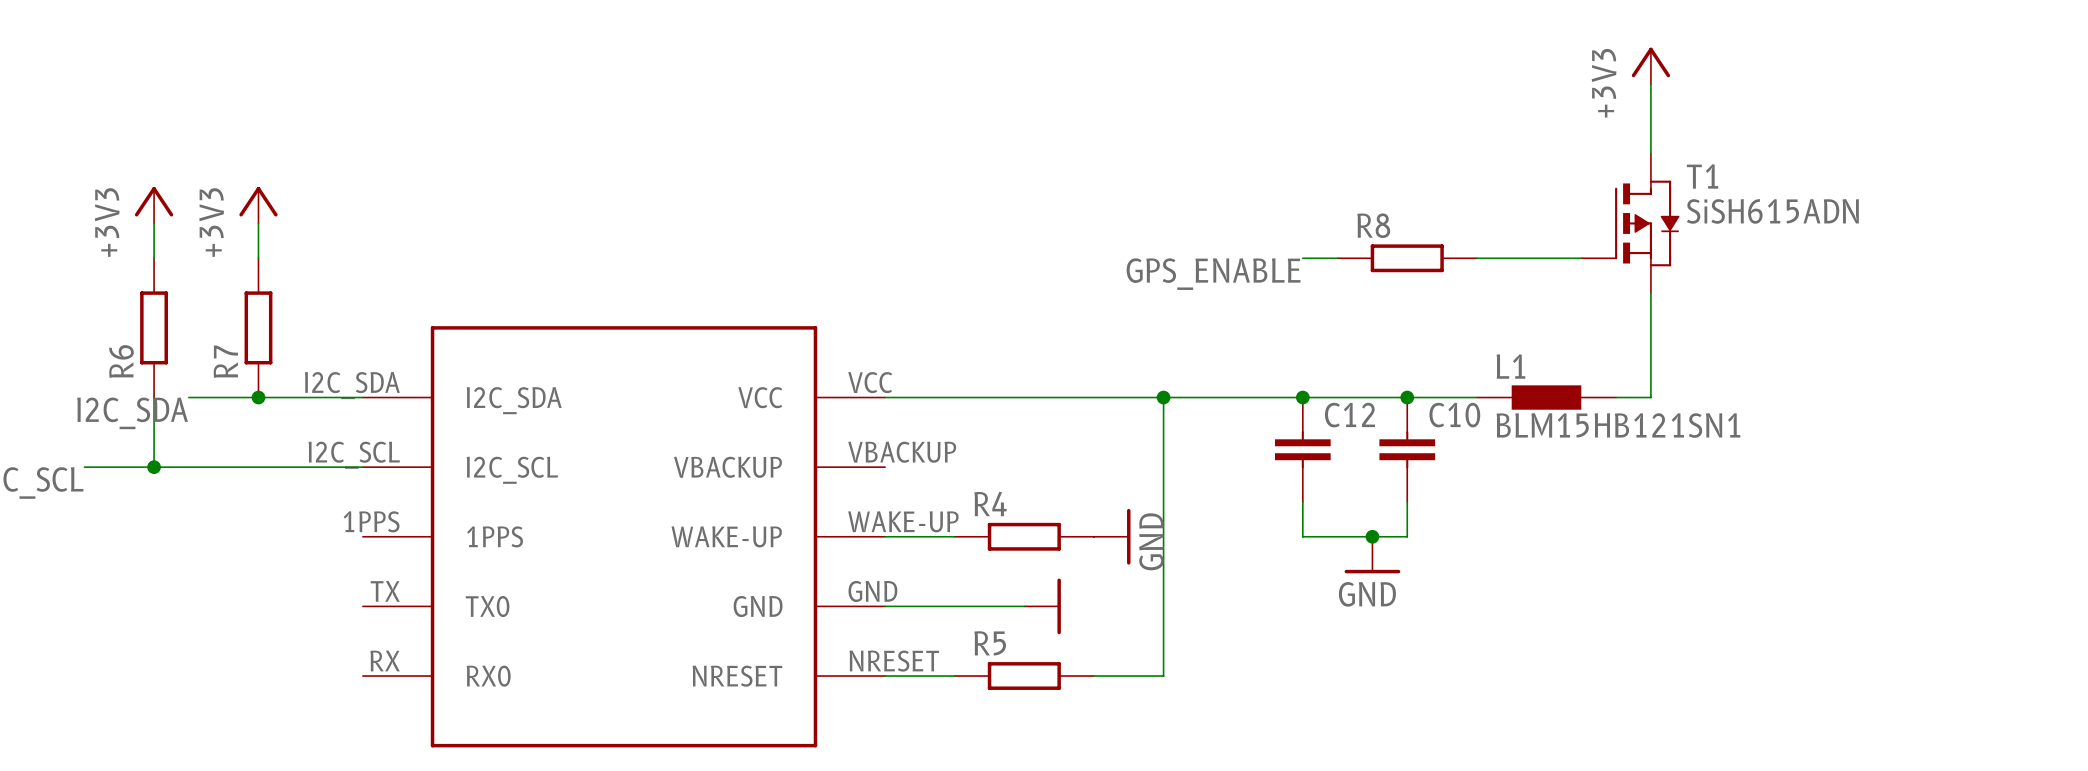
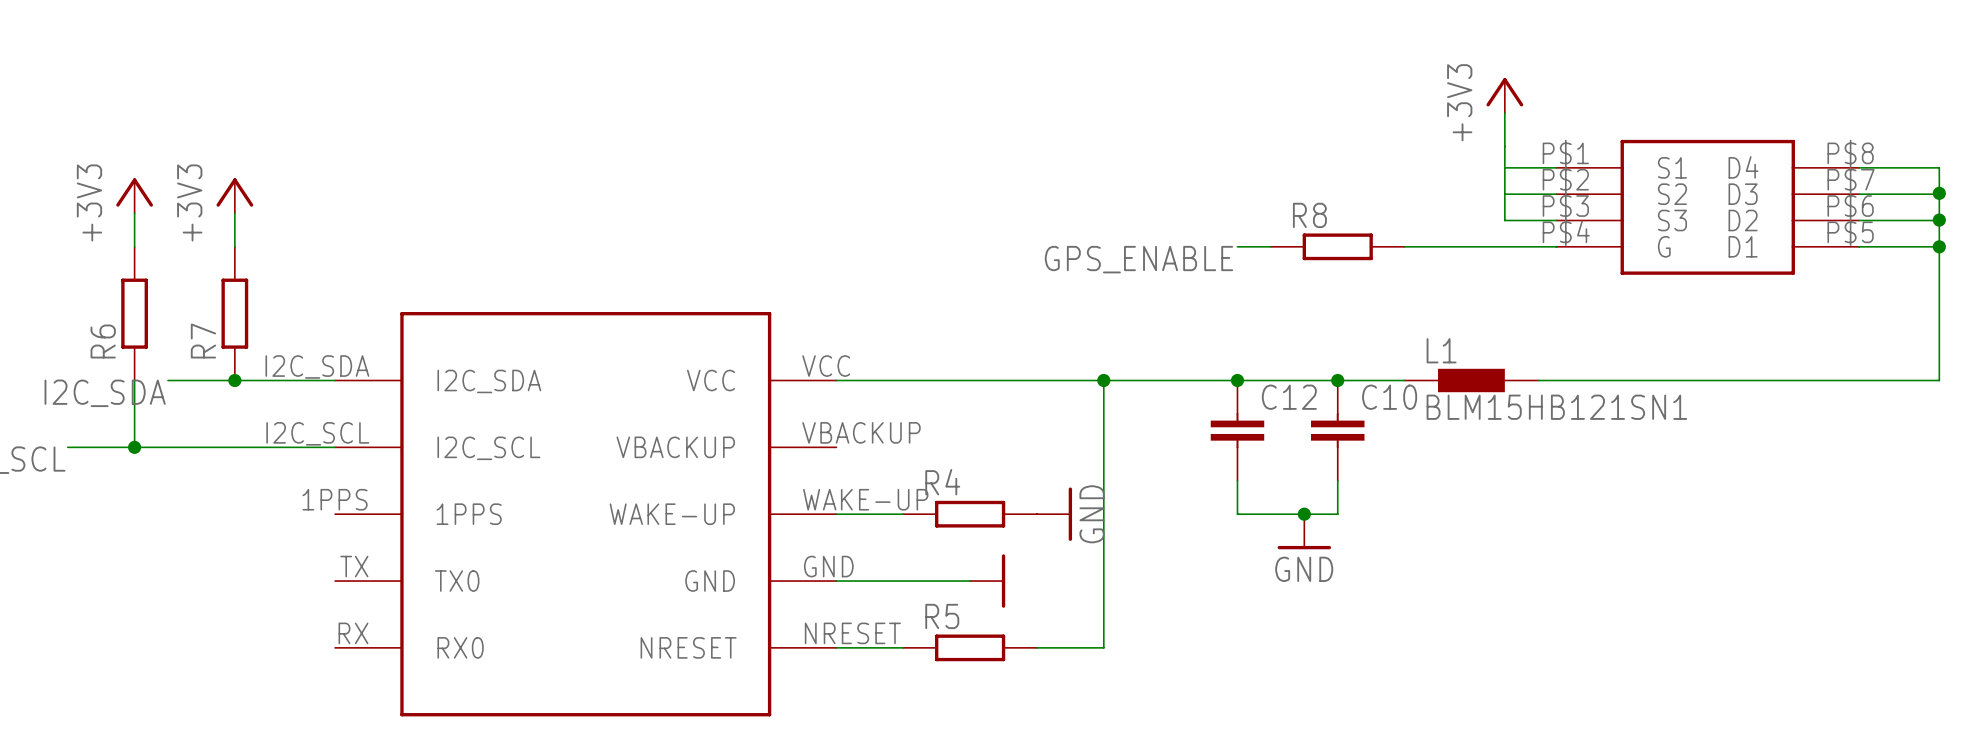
power symbol position: +3V3 (1650, 65) -> +3V3 (1504, 95)
wire: (1650, 84) (1650, 153) -> none
wire: none -> (1504, 113) (1504, 220) (1556, 220)
wire: none -> (1504, 167) (1556, 167)
junction: none -> (1939, 193)
wire: none -> (1504, 194) (1556, 194)
wire: none -> (1859, 194) (1939, 194)
part: none -> (1707, 207)
T1: SiSH615ADN (1630, 223) -> none
wire: none -> (1859, 220) (1939, 220)
junction: none -> (1939, 220)
wire: none -> (1859, 246) (1939, 246)
junction: none -> (1939, 246)
wire: (1650, 293) (1650, 397) -> (1859, 167) (1939, 167) (1939, 380) (1571, 380)

